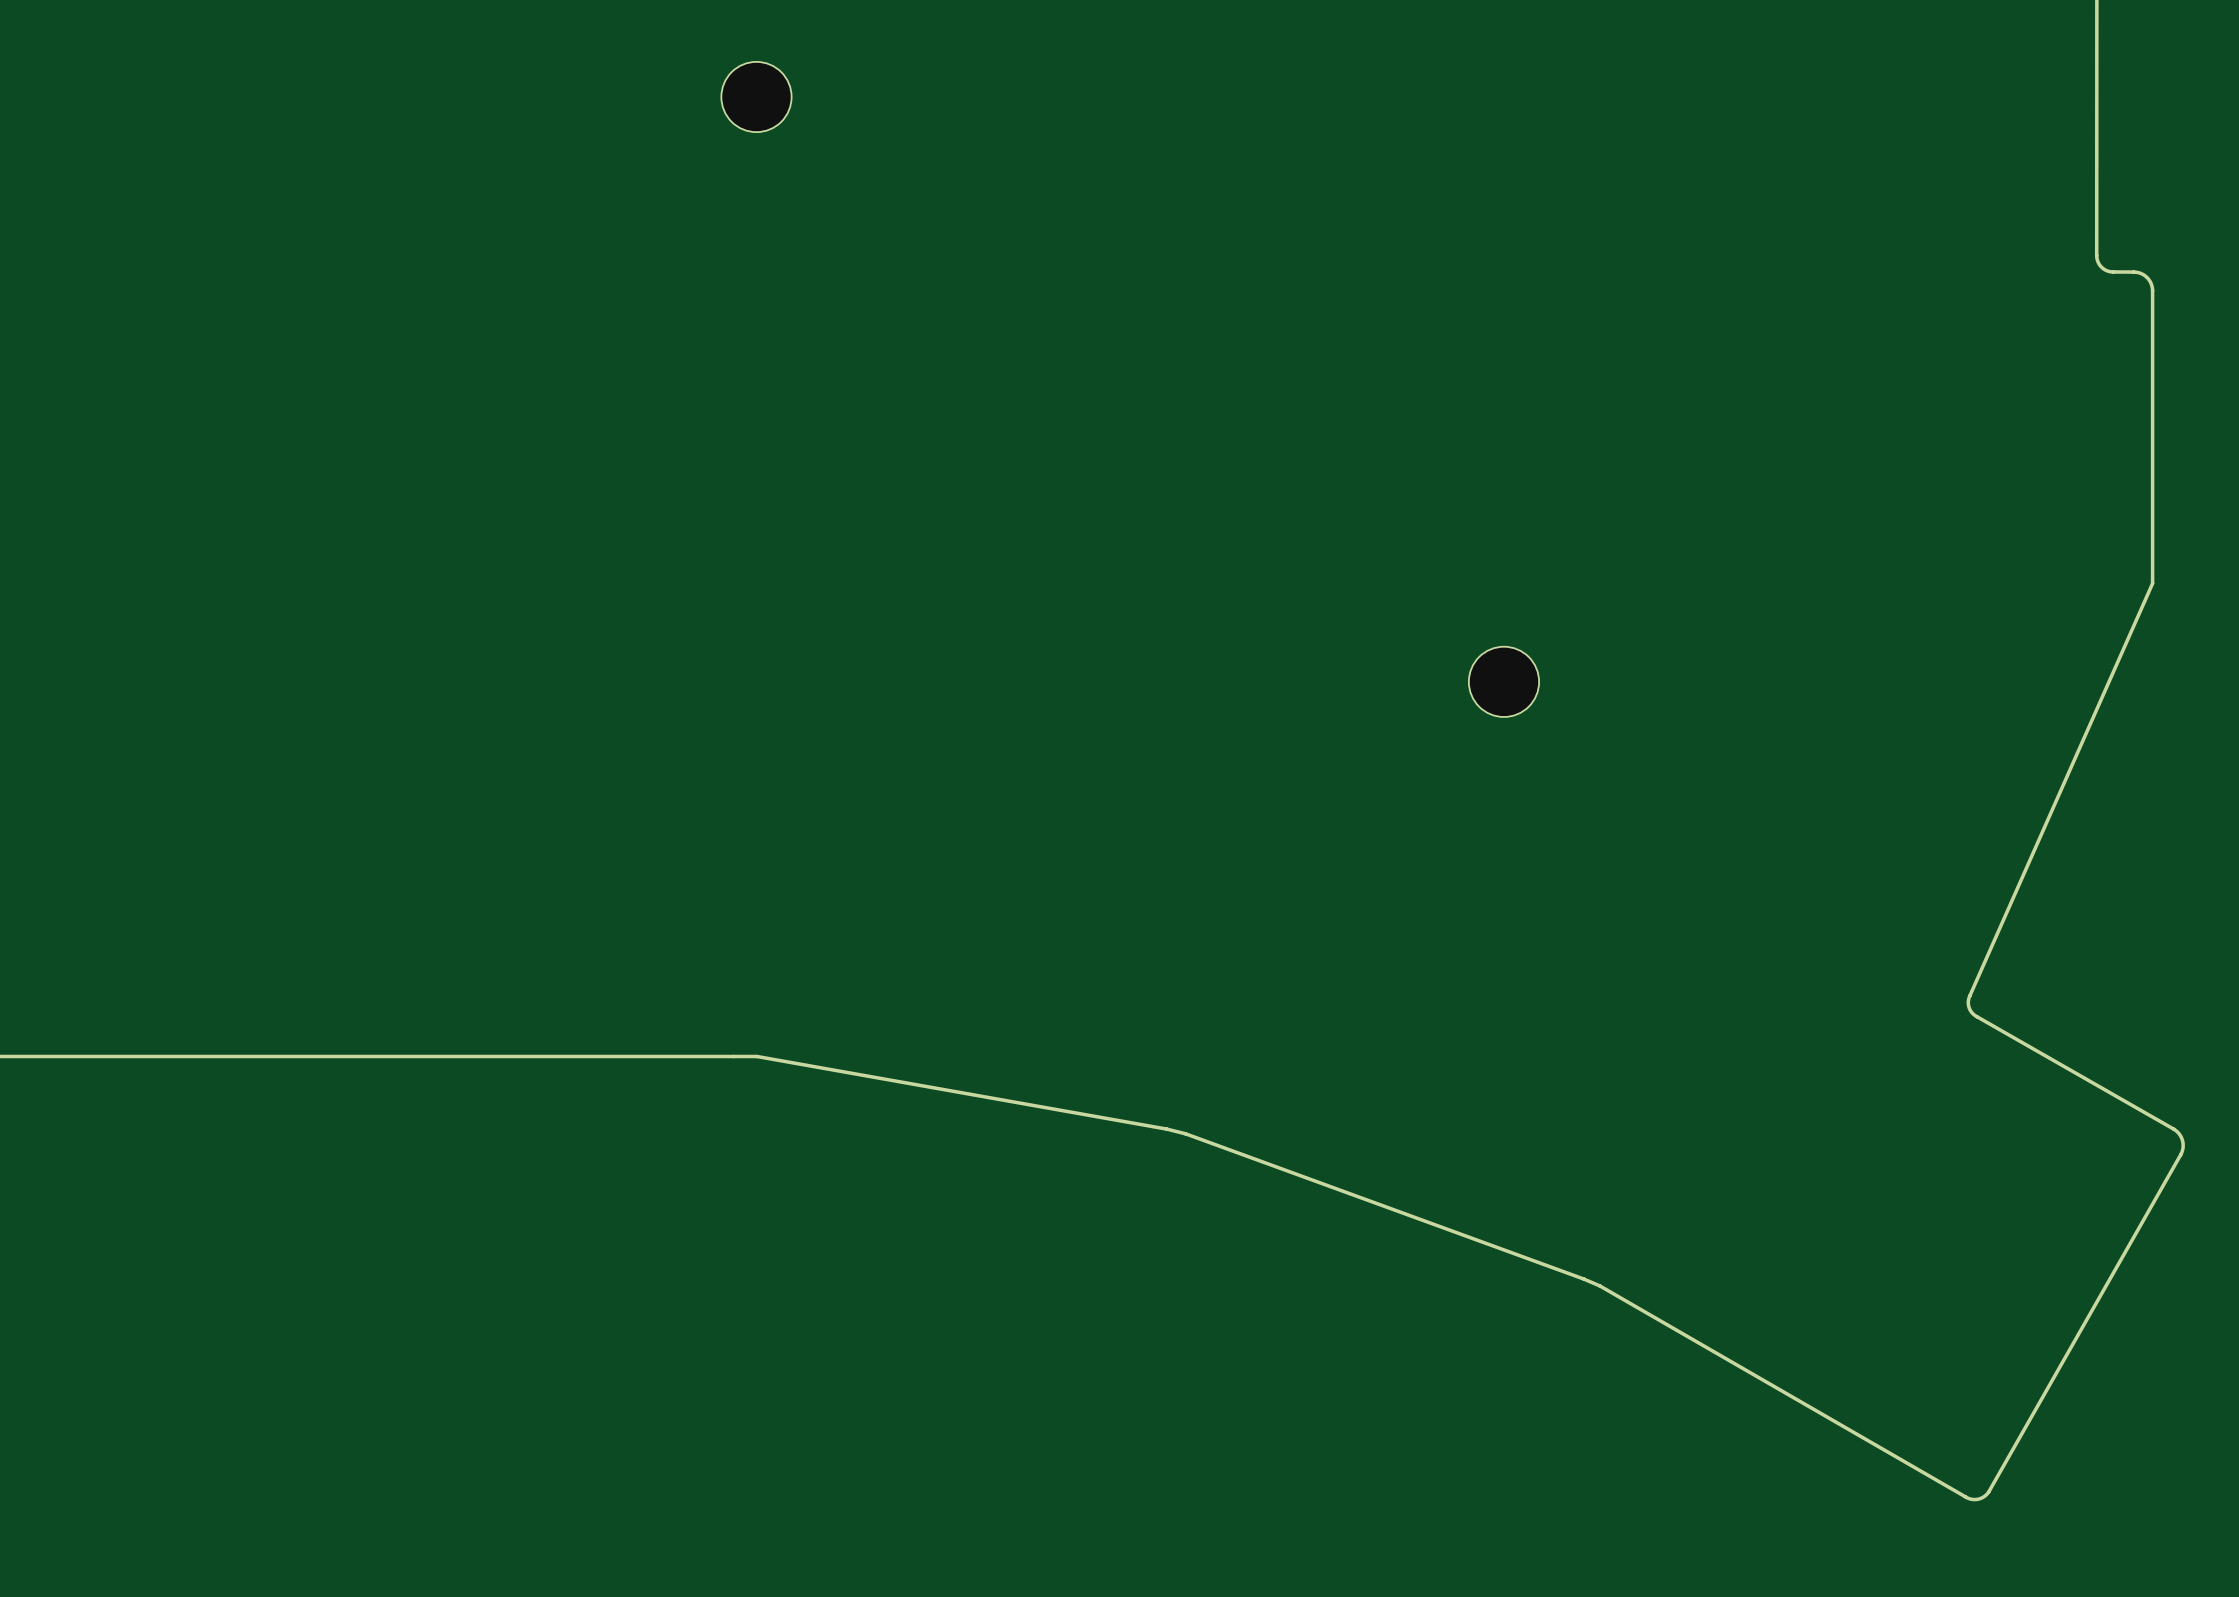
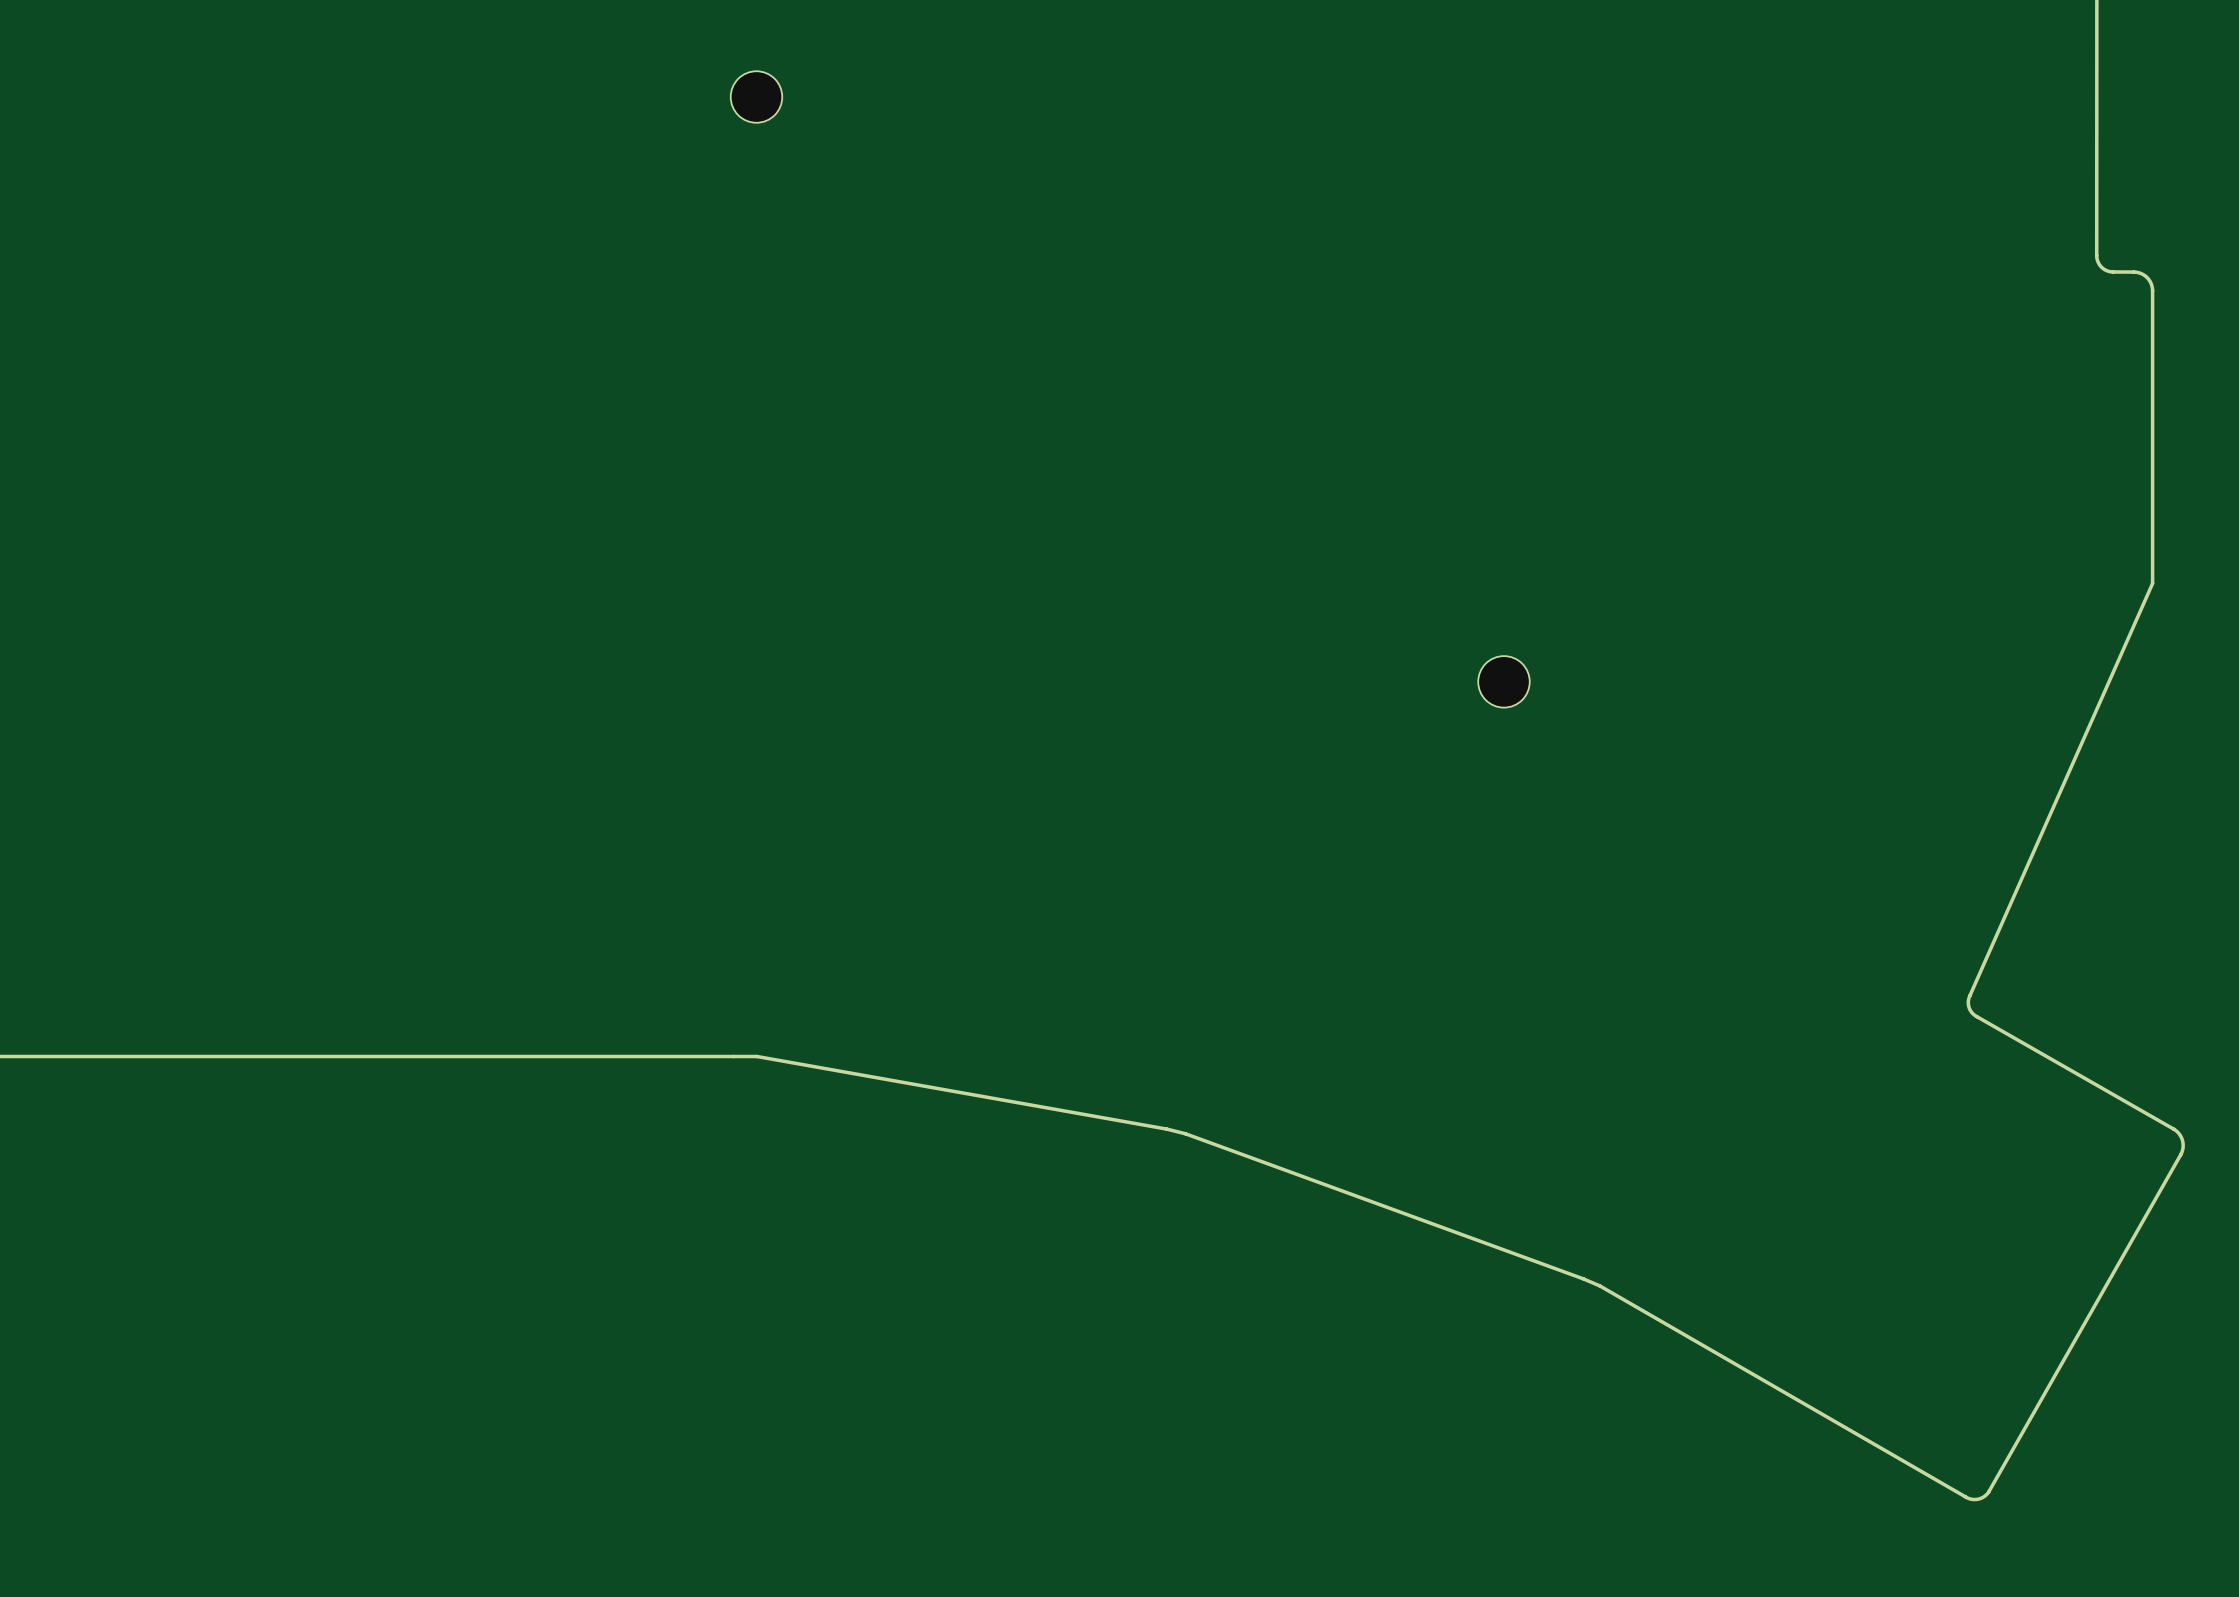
part footprint: [721, 61, 792, 133] -> [730, 71, 783, 123]
part footprint: [1468, 646, 1540, 717] -> [1478, 656, 1530, 708]

